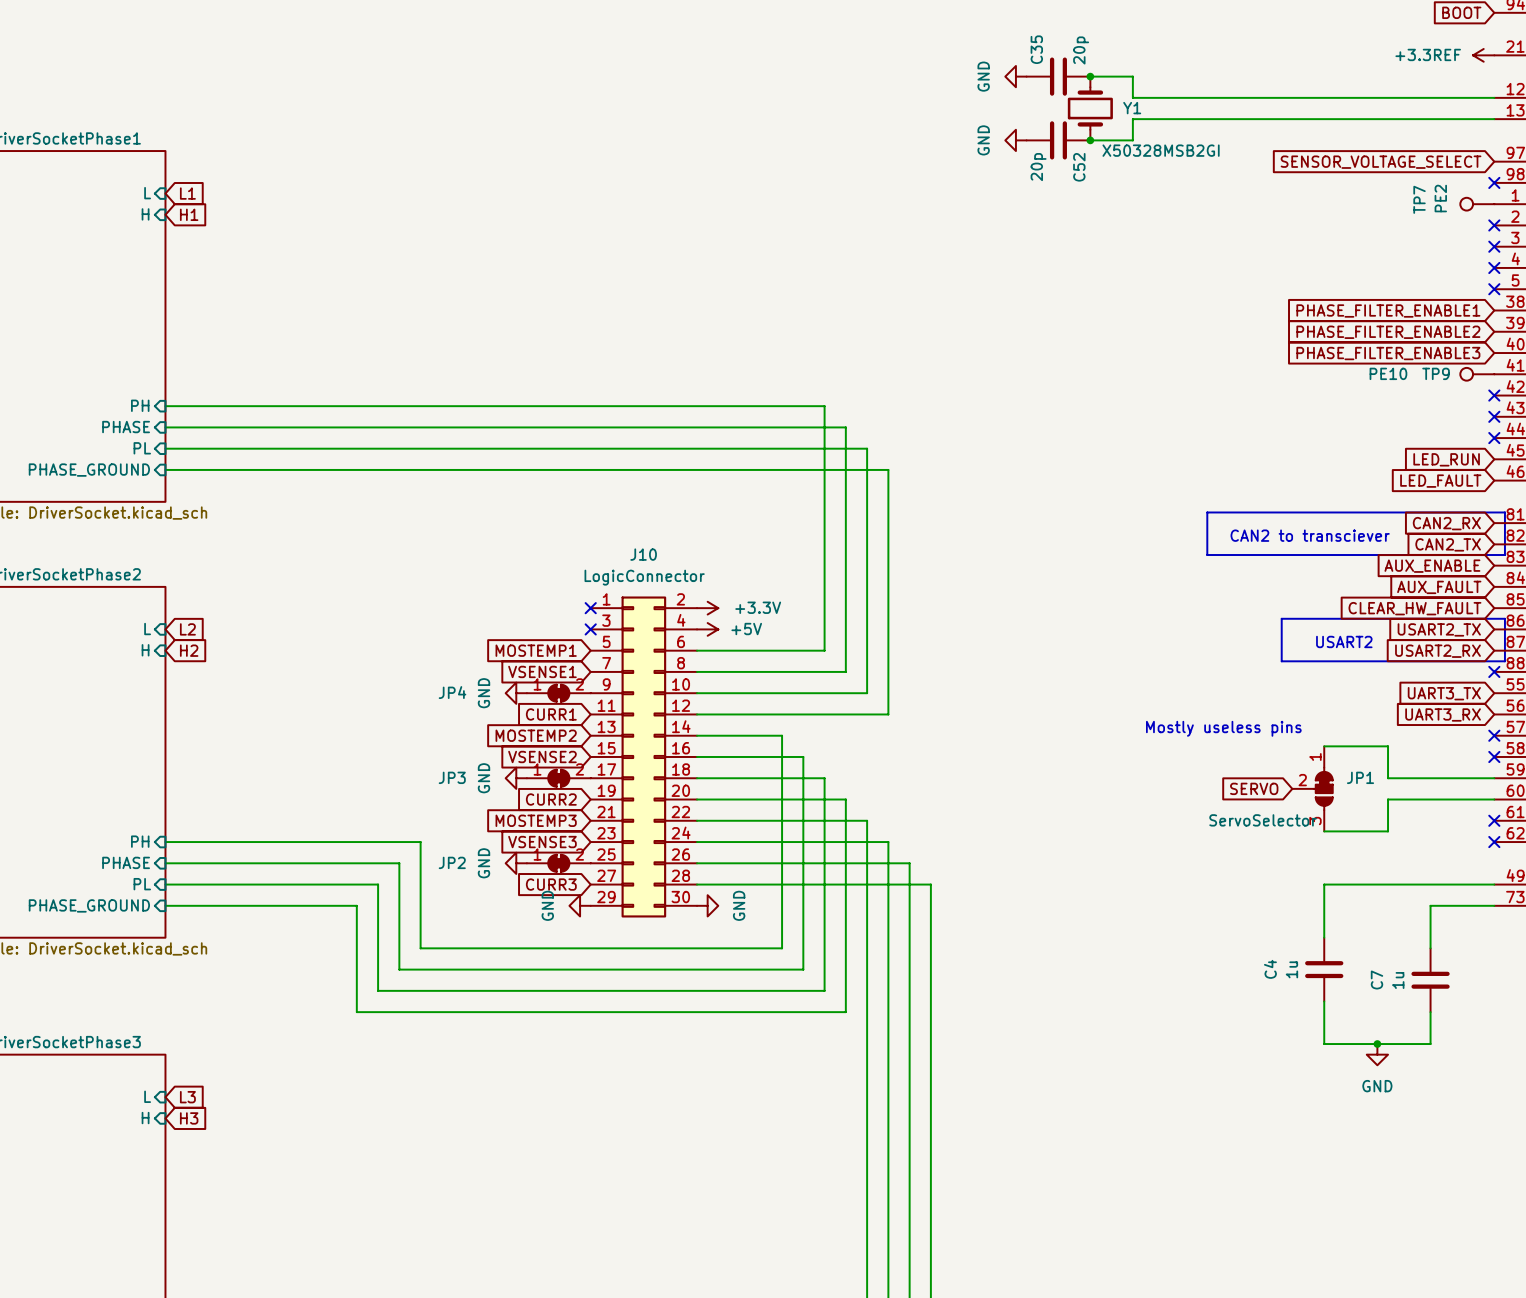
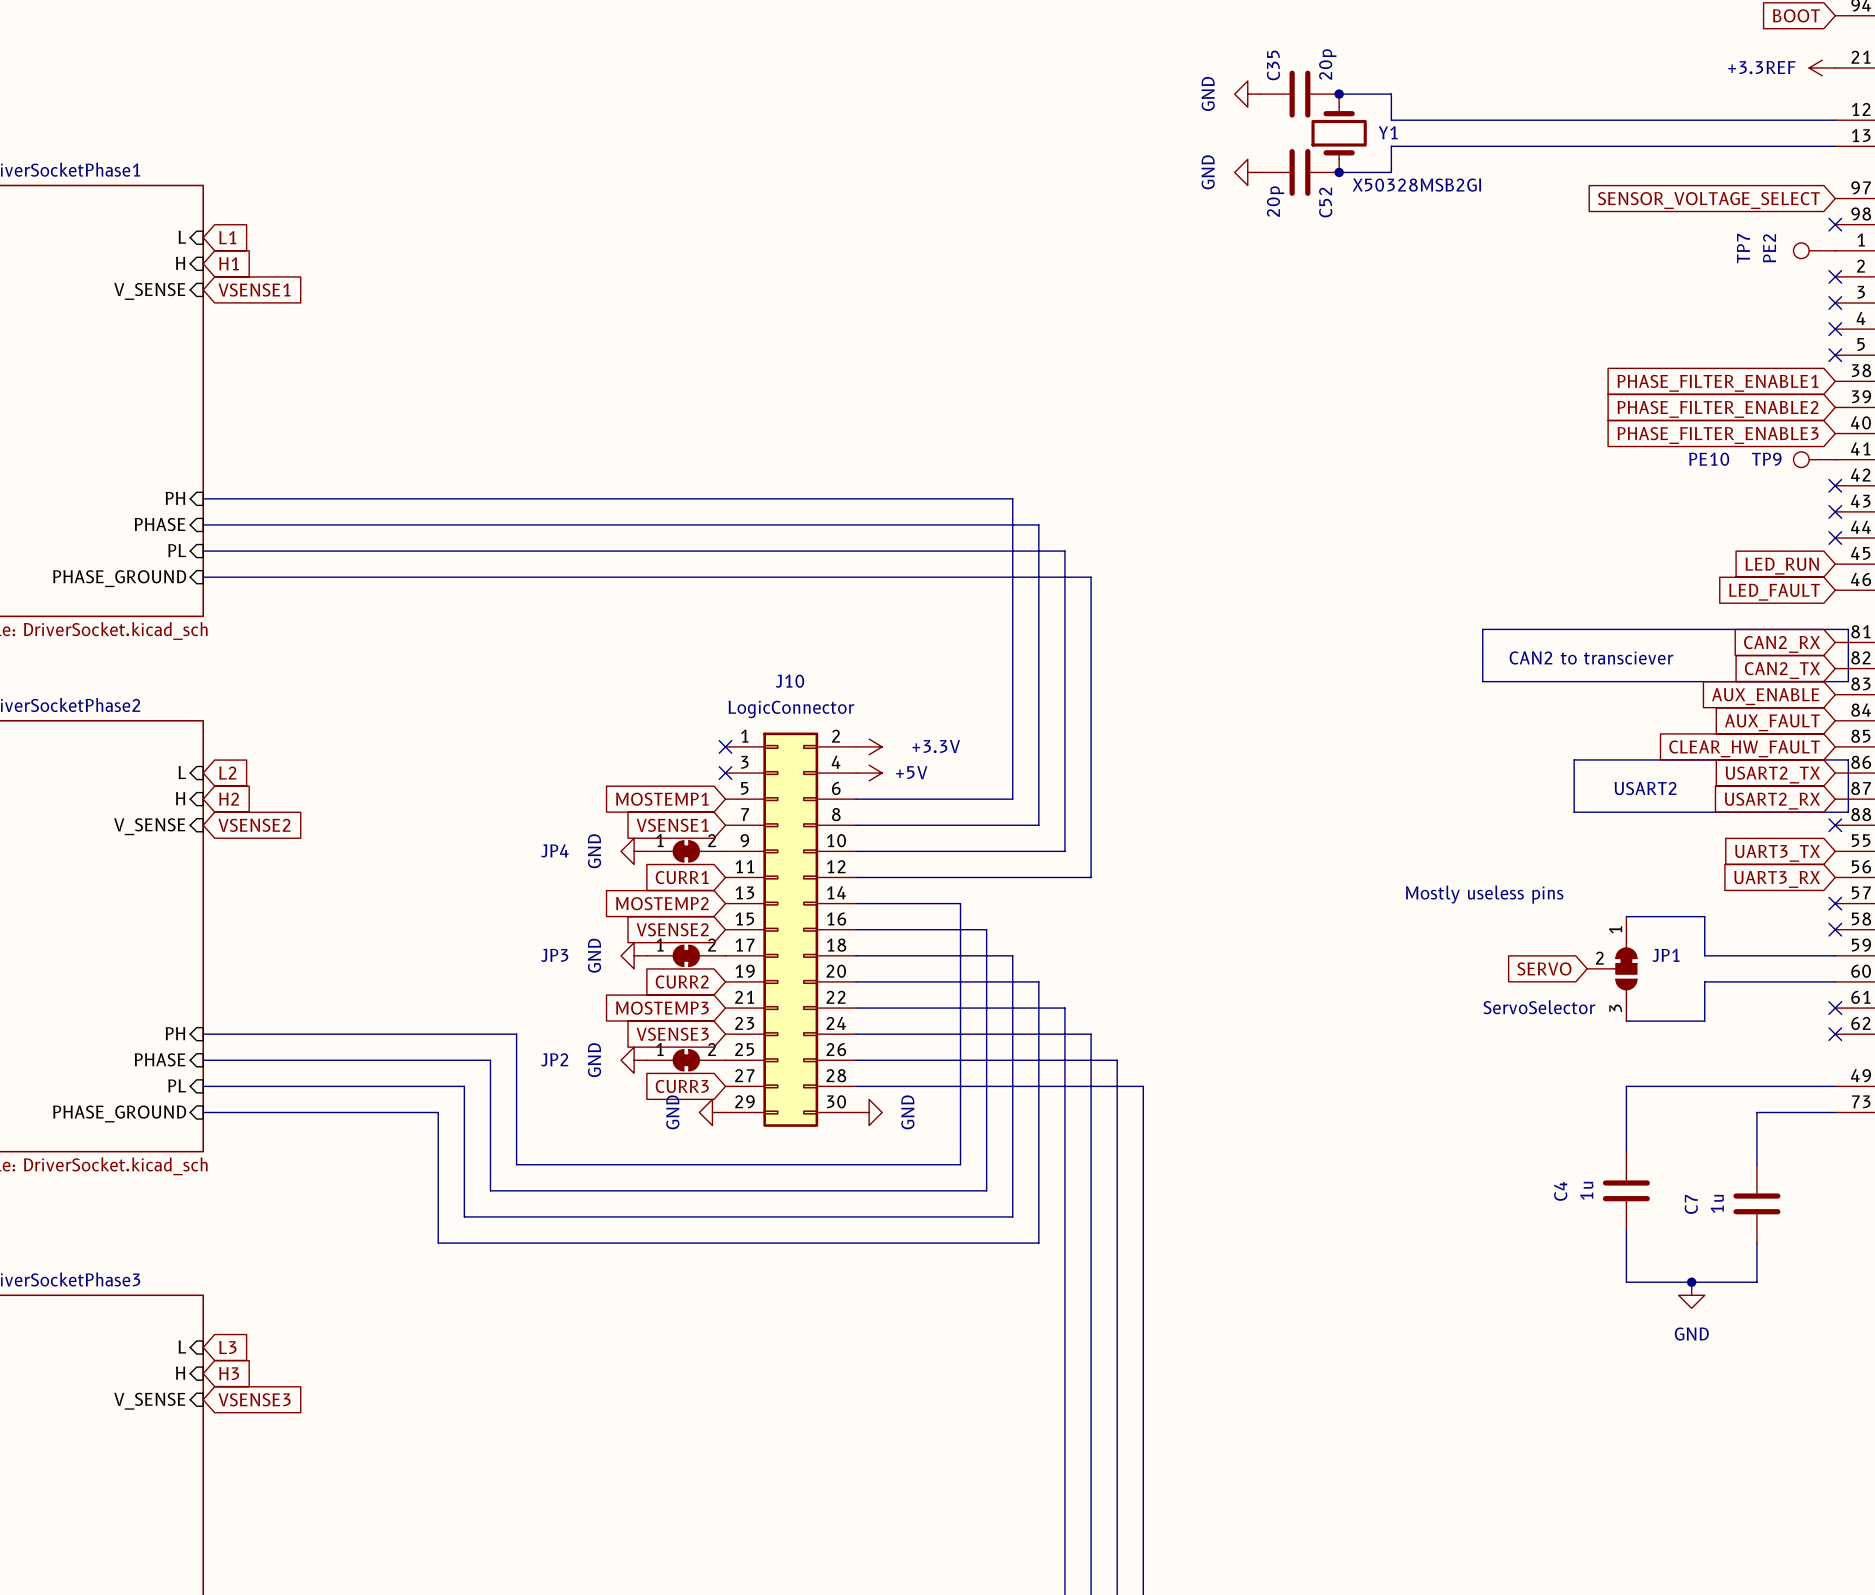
sheet pin: none -> V_SENSE (149, 291)
global label: none -> VSENSE1 (254, 290)
global label: none -> VSENSE2 (254, 825)
sheet pin: none -> V_SENSE (149, 826)
sheet pin: none -> V_SENSE (149, 1401)
global label: none -> VSENSE3 (254, 1399)

